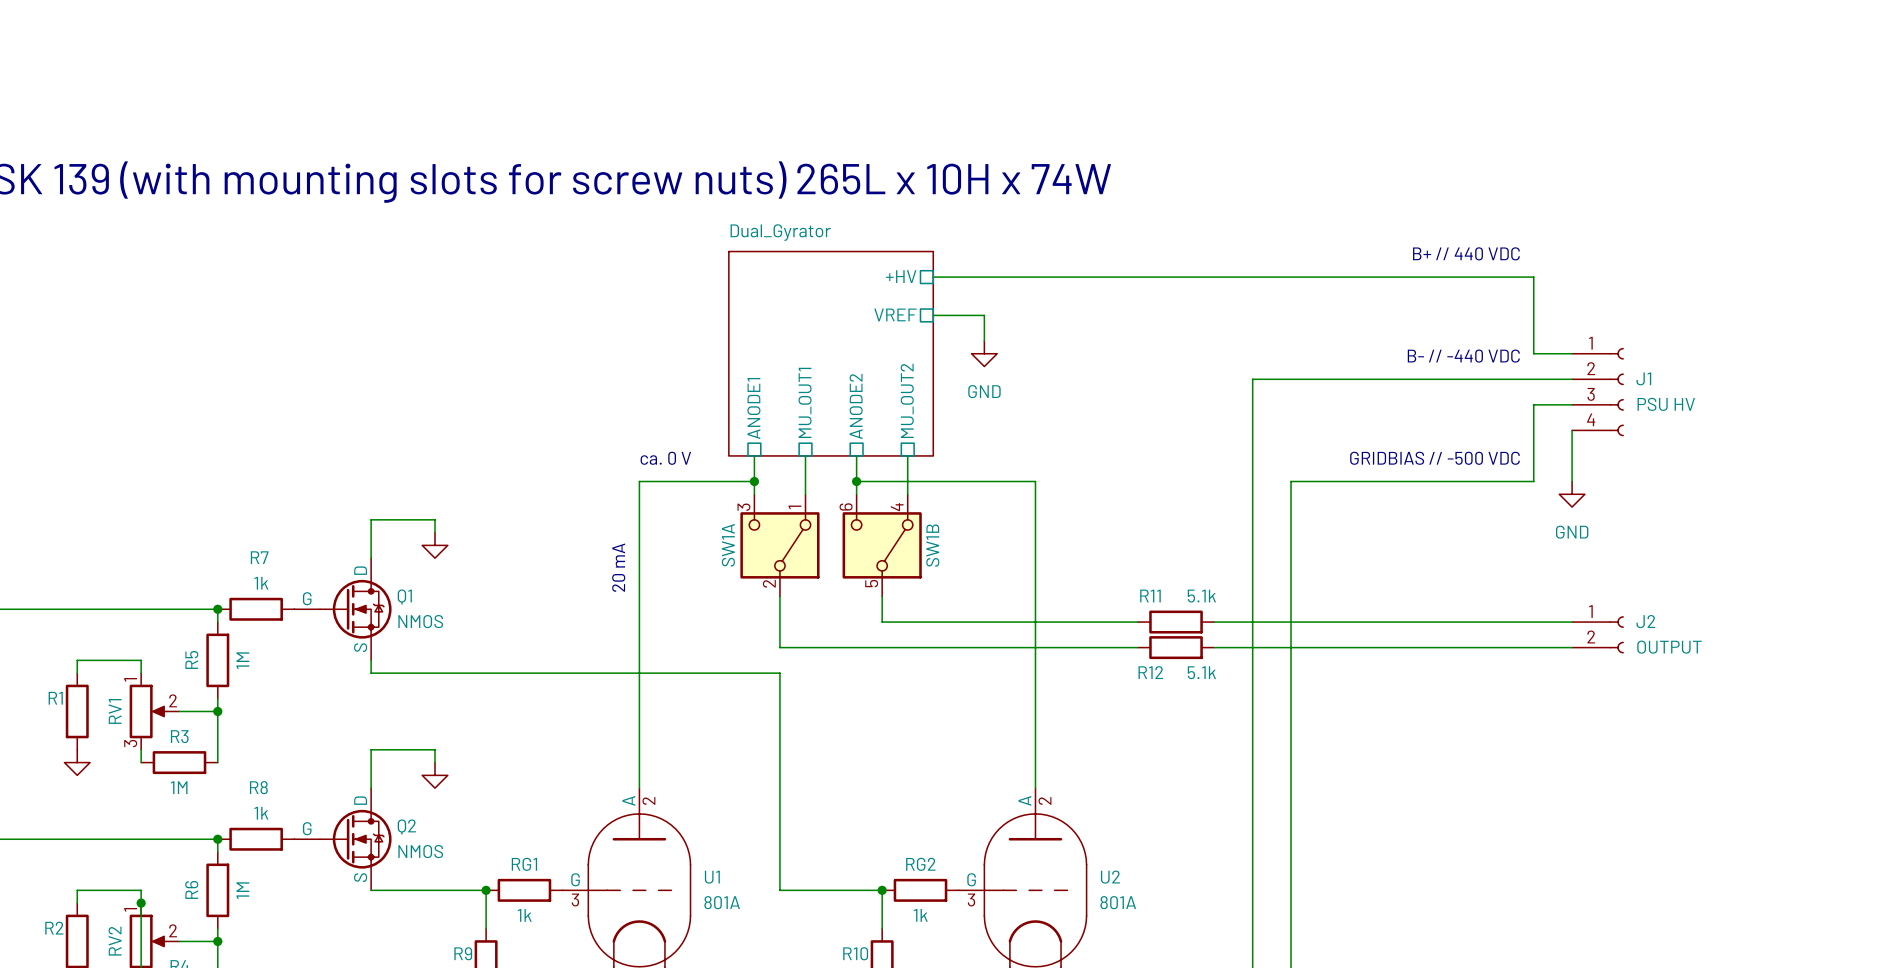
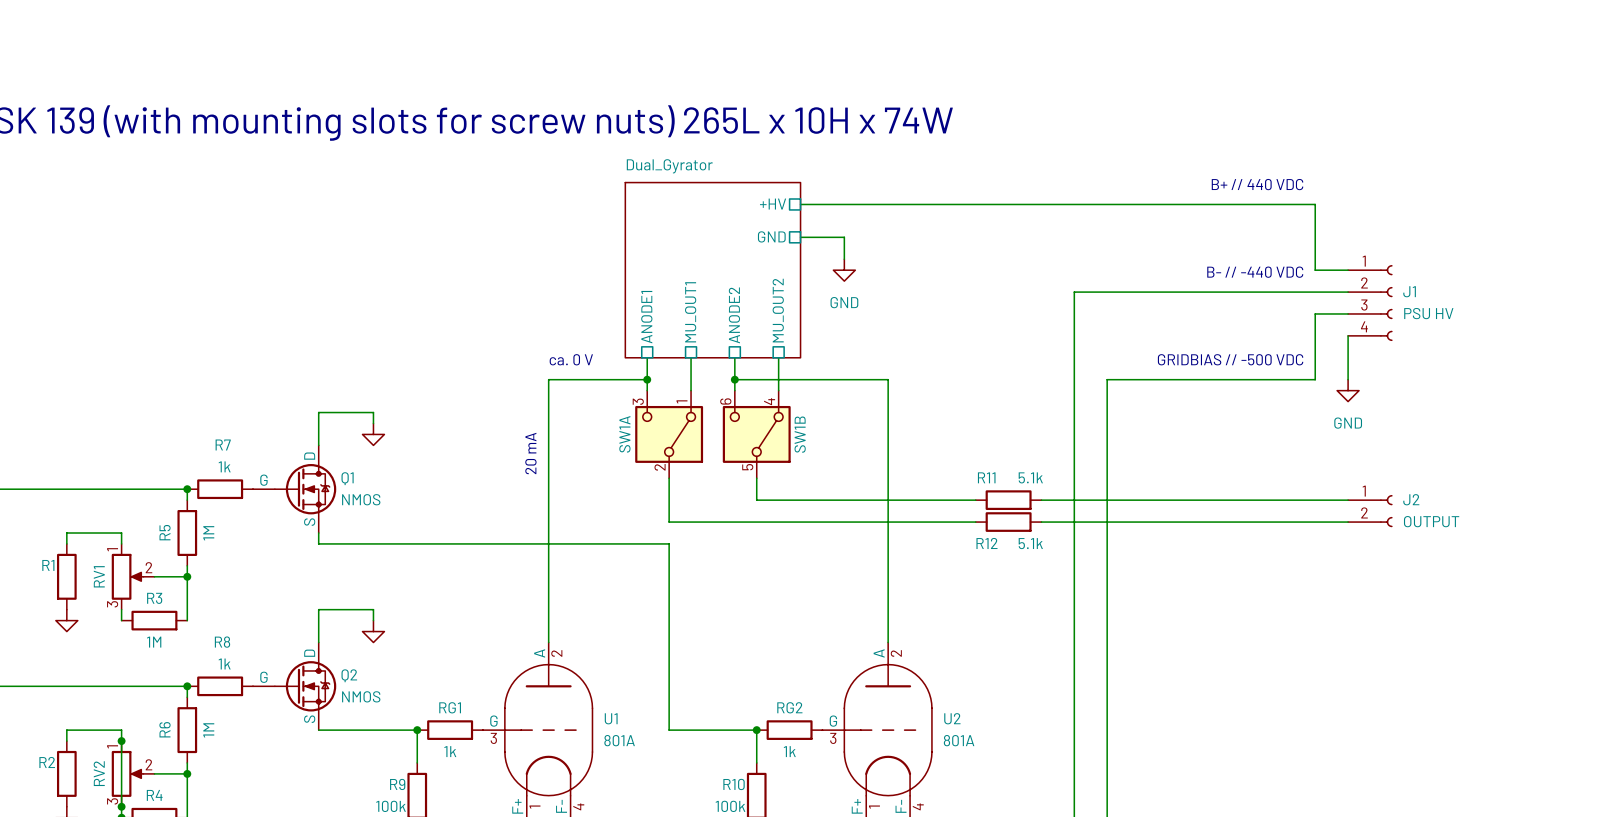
sheet pin: VREF (895, 314) -> GND (771, 236)

